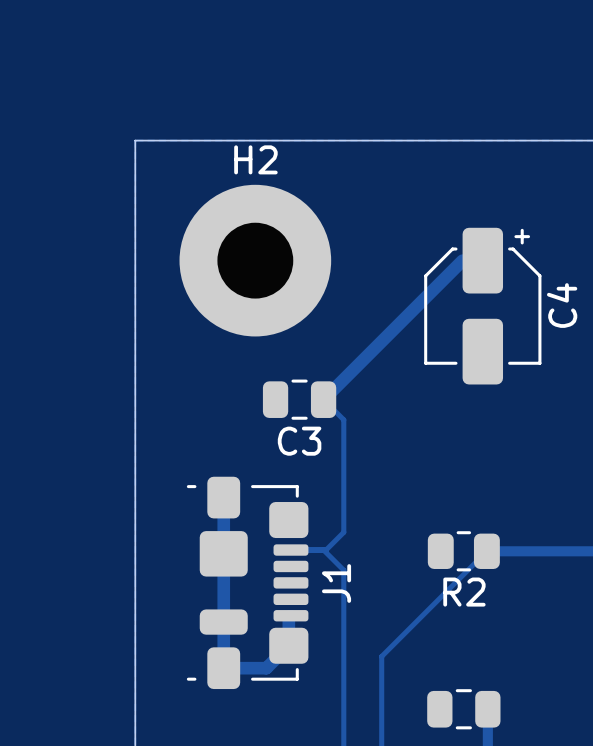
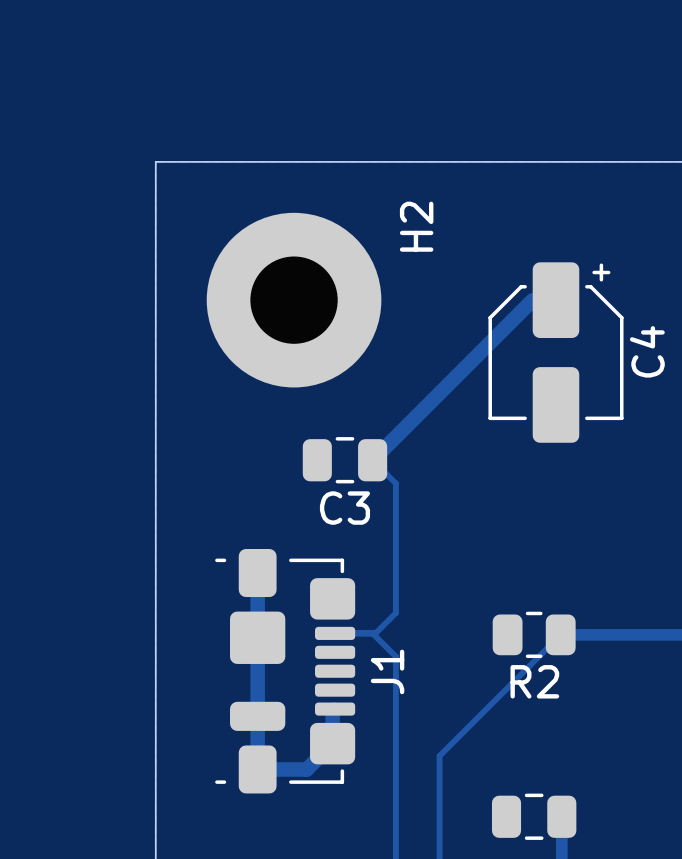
H2 name rotation: 0° (255, 159) -> 90° counterclockwise (416, 226)
H2 name position: H2 (255, 159) -> H2 (416, 226)

